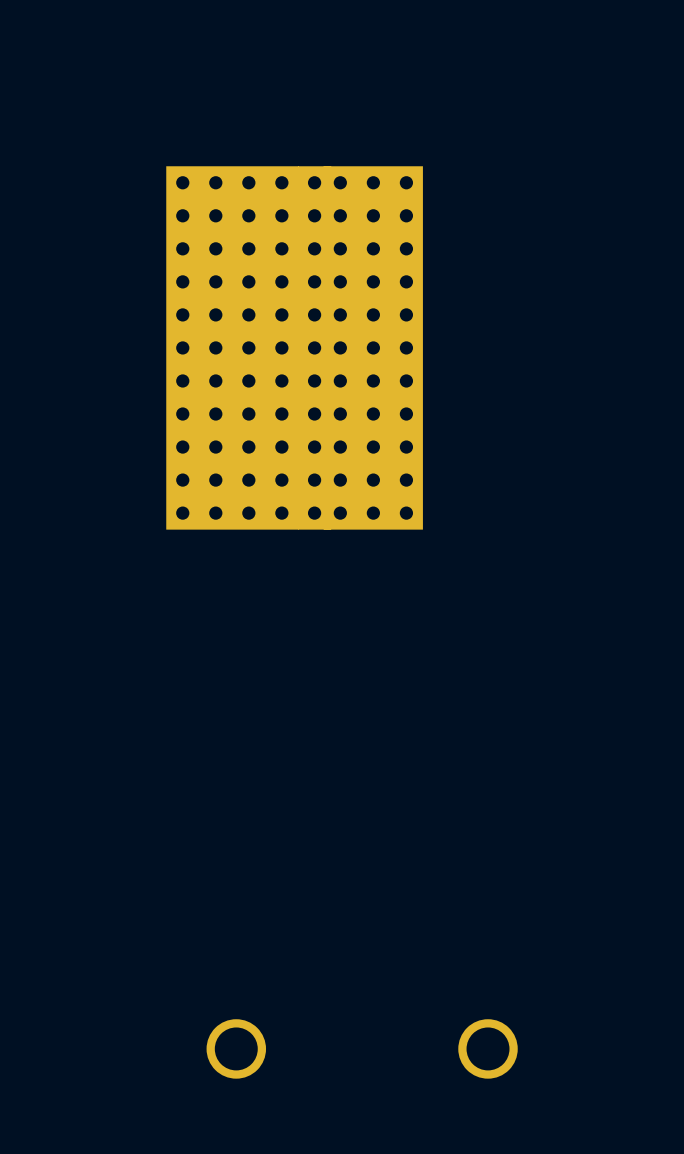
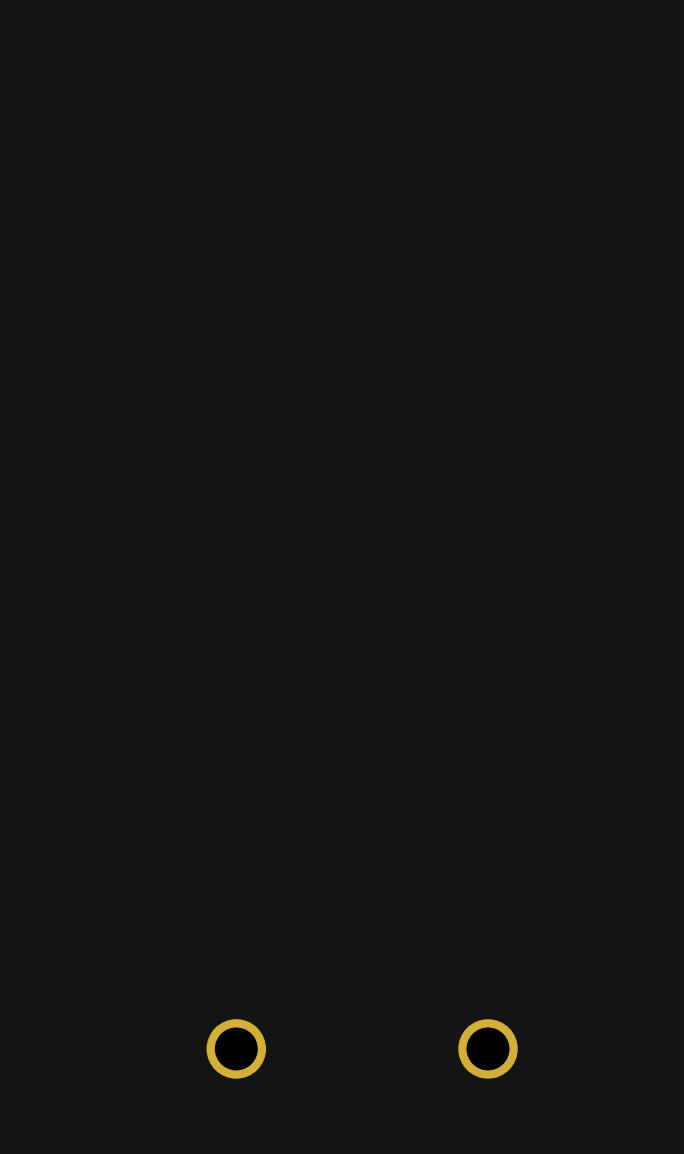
part: (294, 347) -> none

